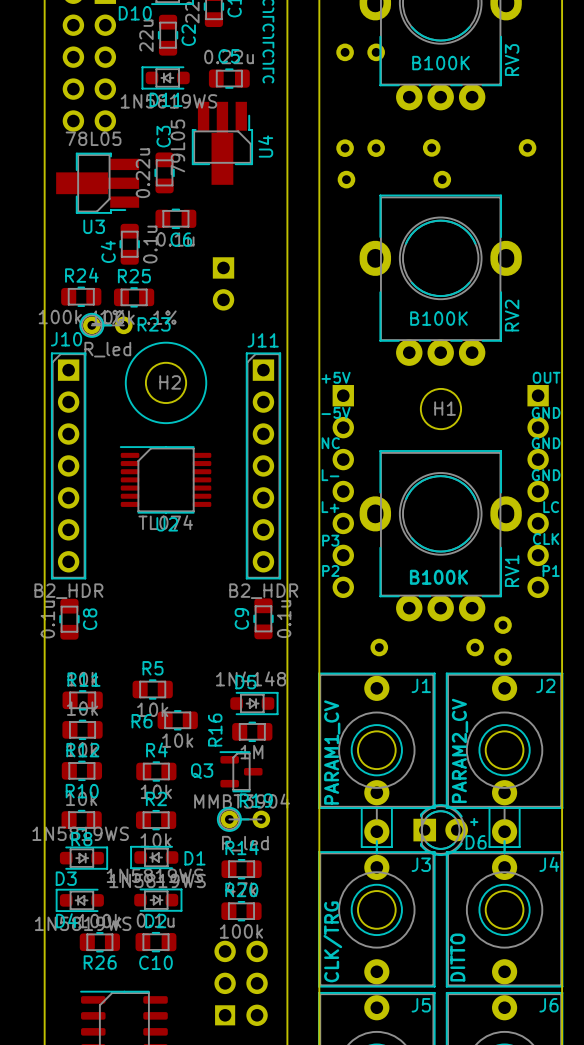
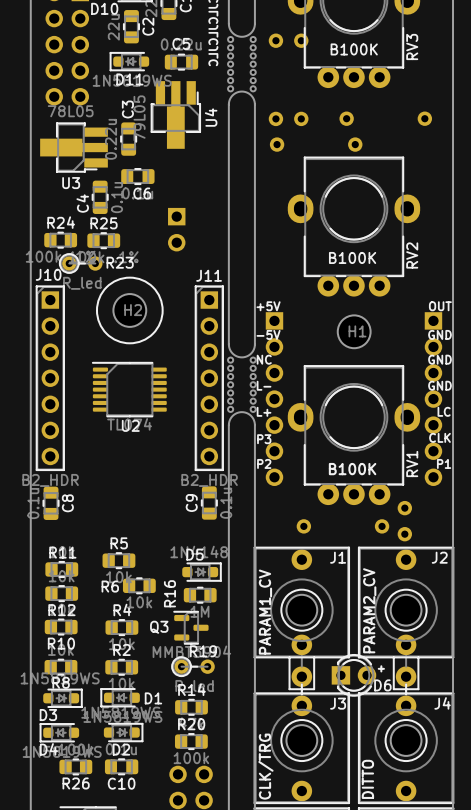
board edge: (287, 31) (287, 130) -> (228, 23) (233, 33) (241, 36) (251, 32) (254, 23)
board edge: (319, 31) (319, 130) -> (228, 104) (233, 94) (241, 91) (251, 95) (254, 104)
part: none -> (241, 64)
board edge: (287, 424) (287, 523) -> (228, 344) (232, 353) (241, 357) (251, 353) (254, 344)
board edge: (319, 424) (319, 523) -> (228, 425) (232, 415) (241, 412) (251, 415) (254, 425)
part: none -> (241, 384)

